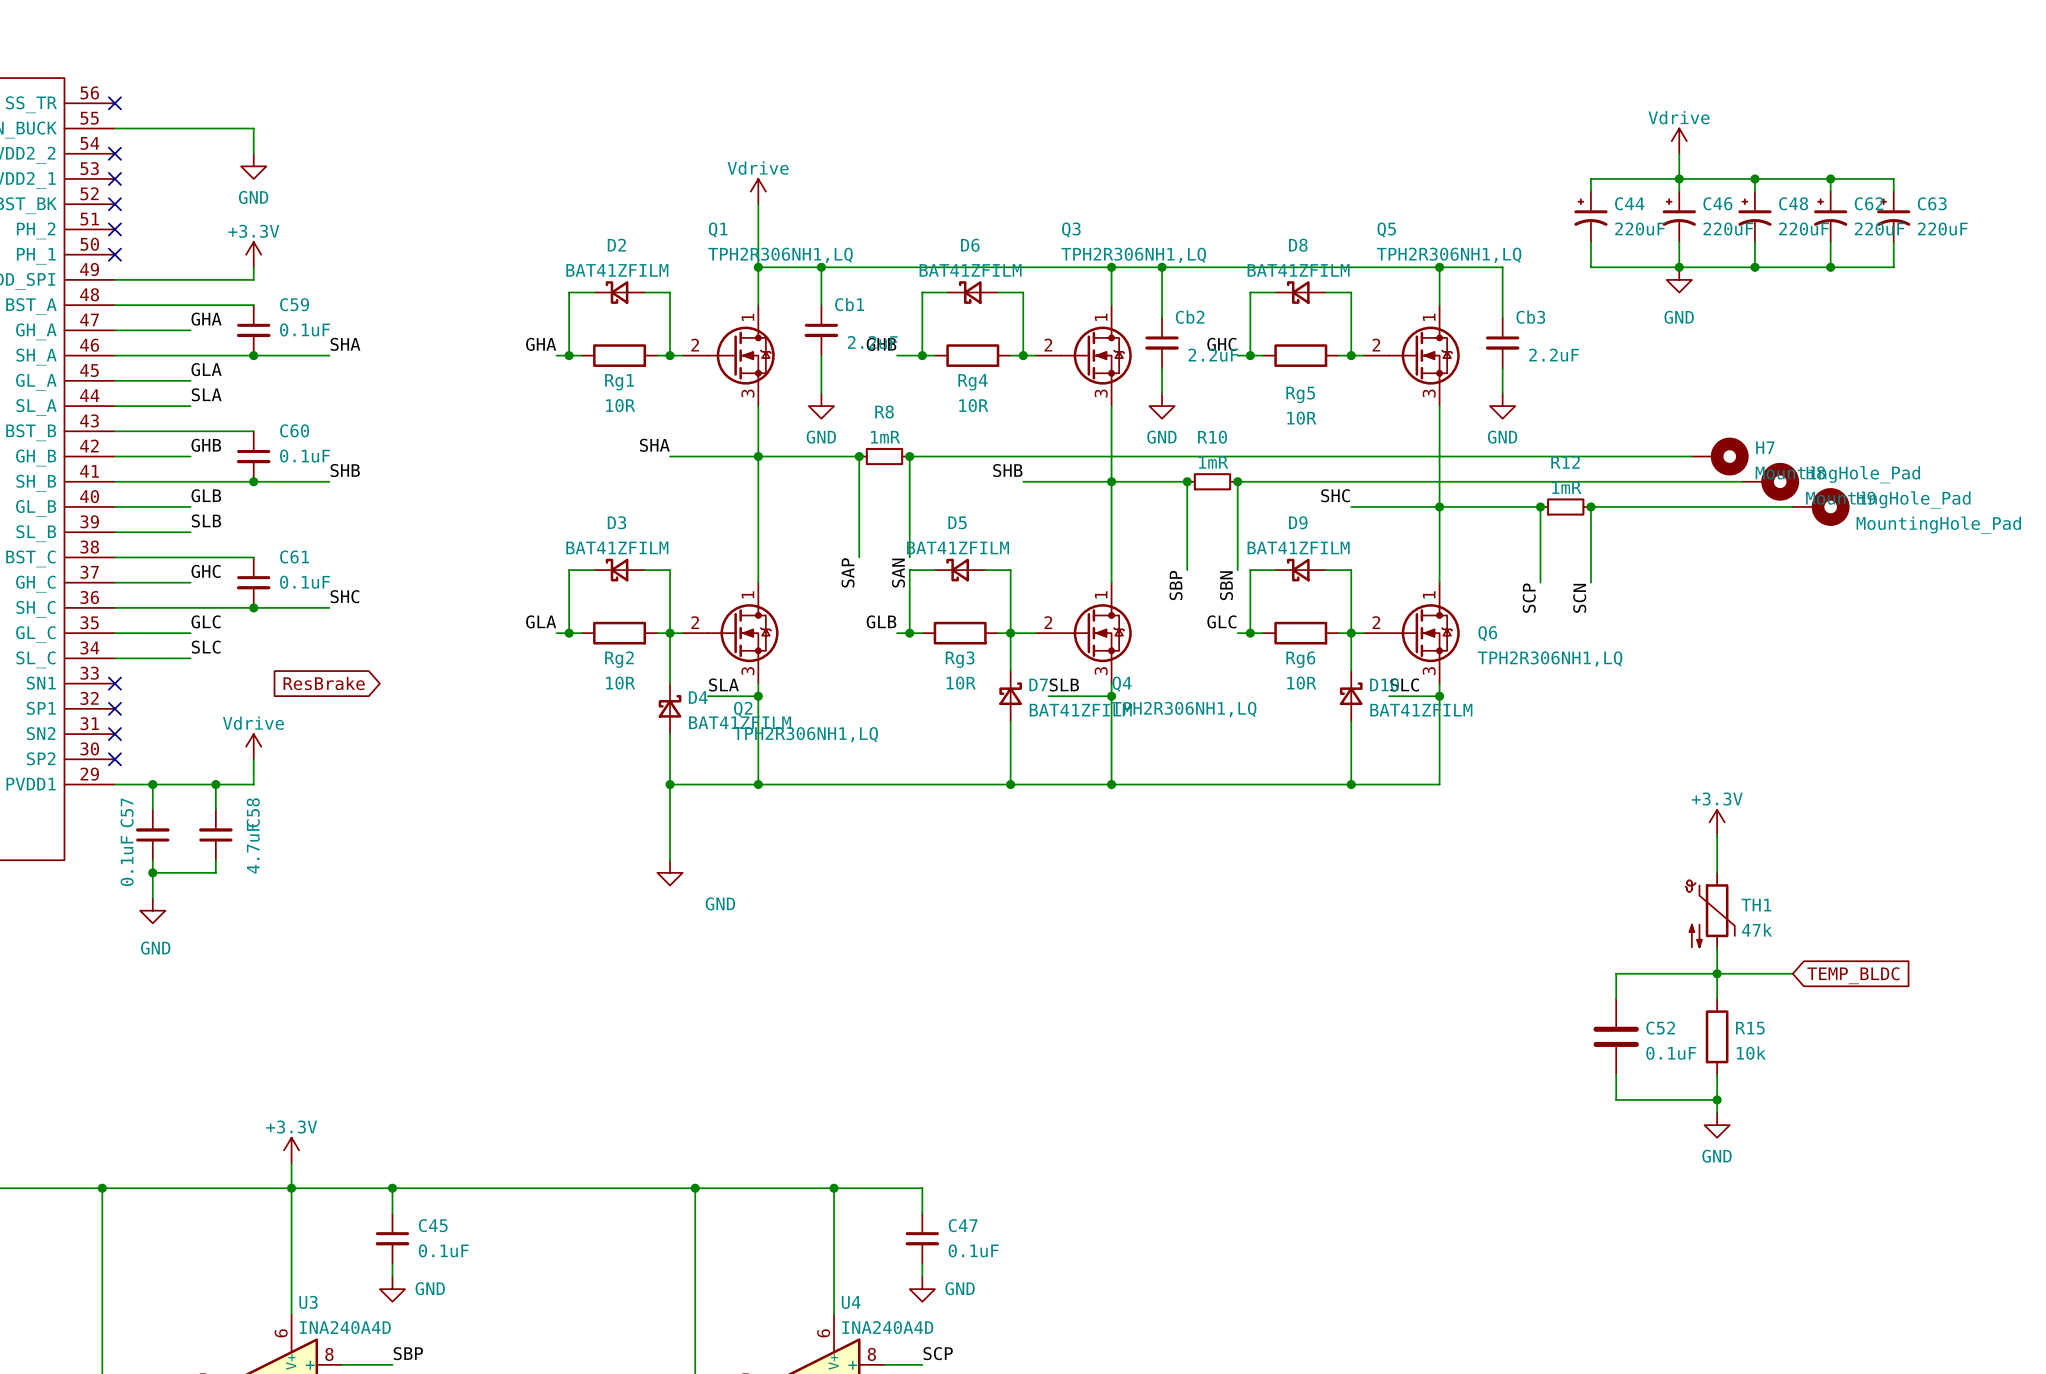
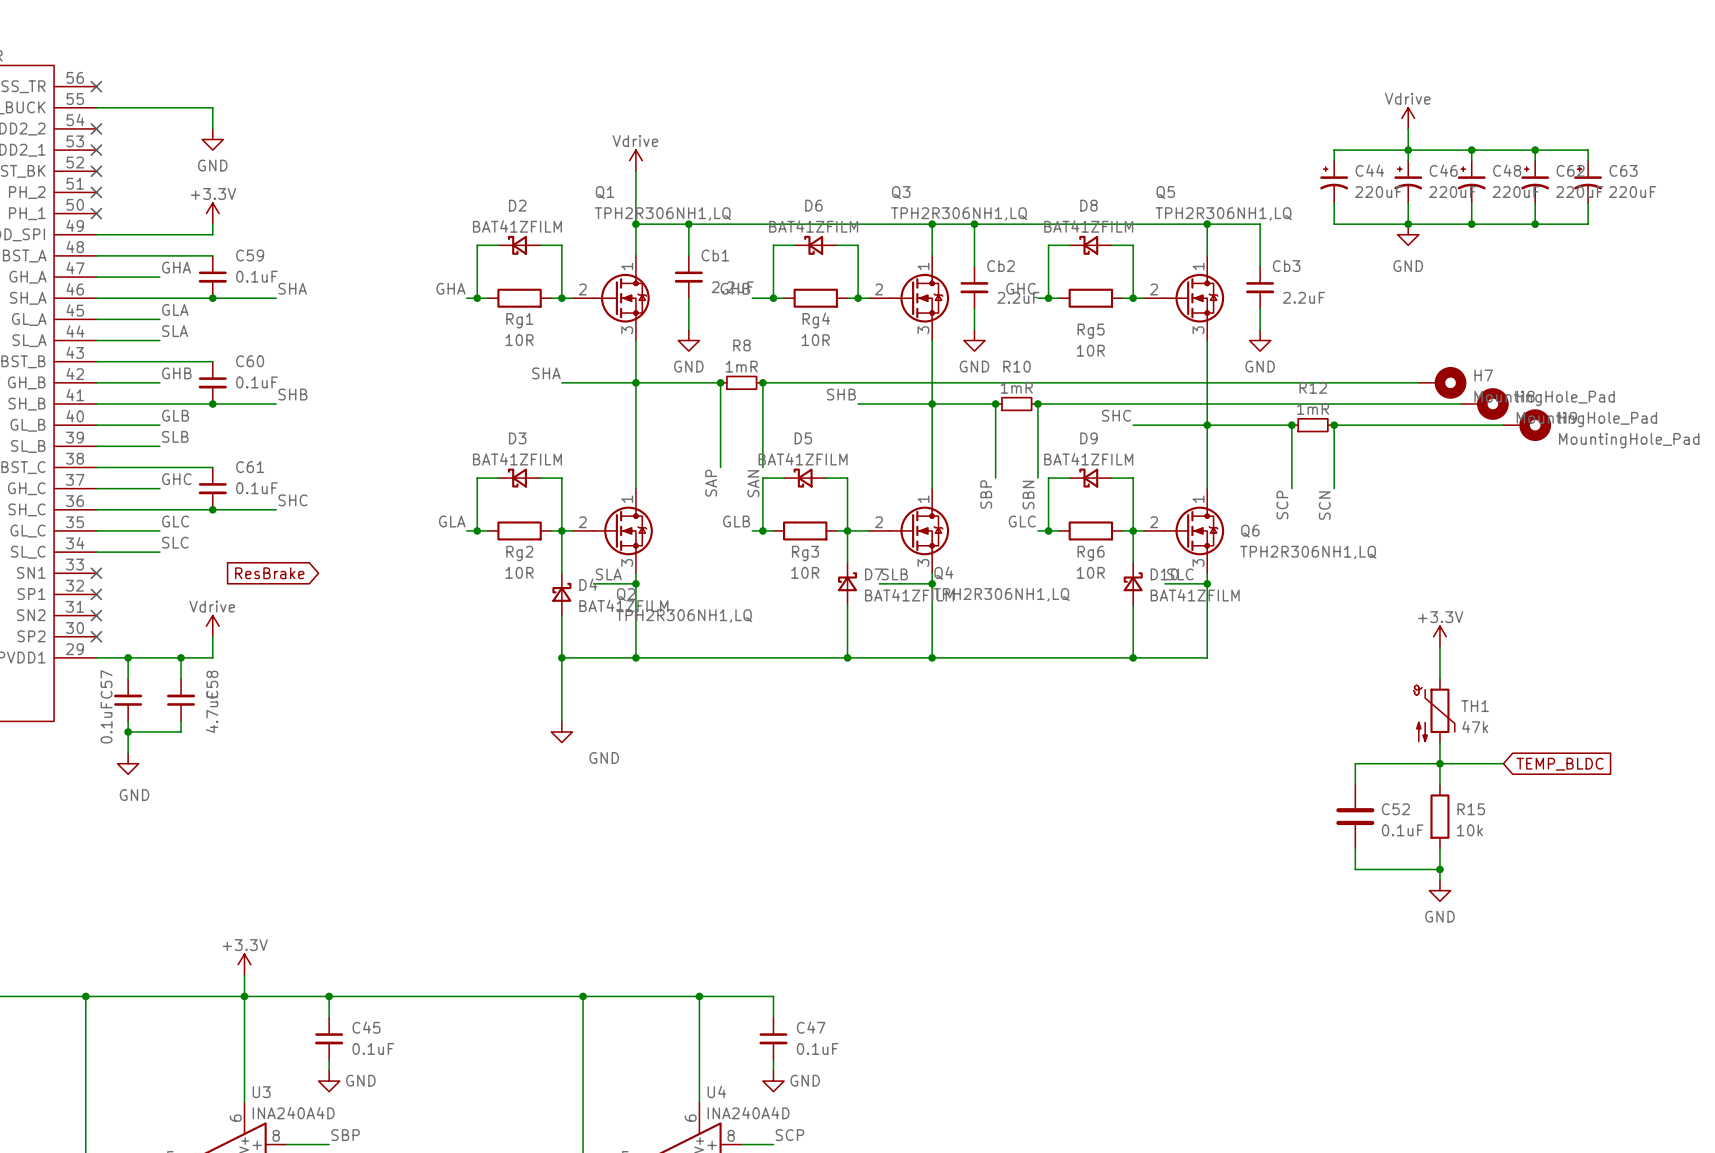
power symbol position: +3.3V (1717, 822) -> +3.3V (1439, 636)
wire: (1717, 835) (1717, 872) -> (1439, 647) (1439, 679)
TH1 position: (1710, 910) -> (1434, 710)
junction: none -> (1439, 763)
wire: (1717, 948) (1717, 999) -> (1439, 742) (1439, 784)
junction: (1717, 973) -> none
wire: (1792, 973) (1616, 973) (1616, 999) -> (1503, 763) (1355, 763) (1355, 784)
global label position: TEMP_BLDC (1853, 975) -> TEMP_BLDC (1560, 764)
C52 position: (1616, 1036) -> (1355, 816)
junction: none -> (1439, 869)
R15 position: (1717, 1036) -> (1439, 816)
wire: (1616, 1074) (1616, 1099) (1717, 1099) -> (1355, 848) (1355, 869) (1439, 869)
wire: (1717, 1074) (1717, 1112) -> (1439, 848) (1439, 880)
junction: (1717, 1099) -> none
power symbol position: GND (1717, 1125) -> GND (1439, 890)

